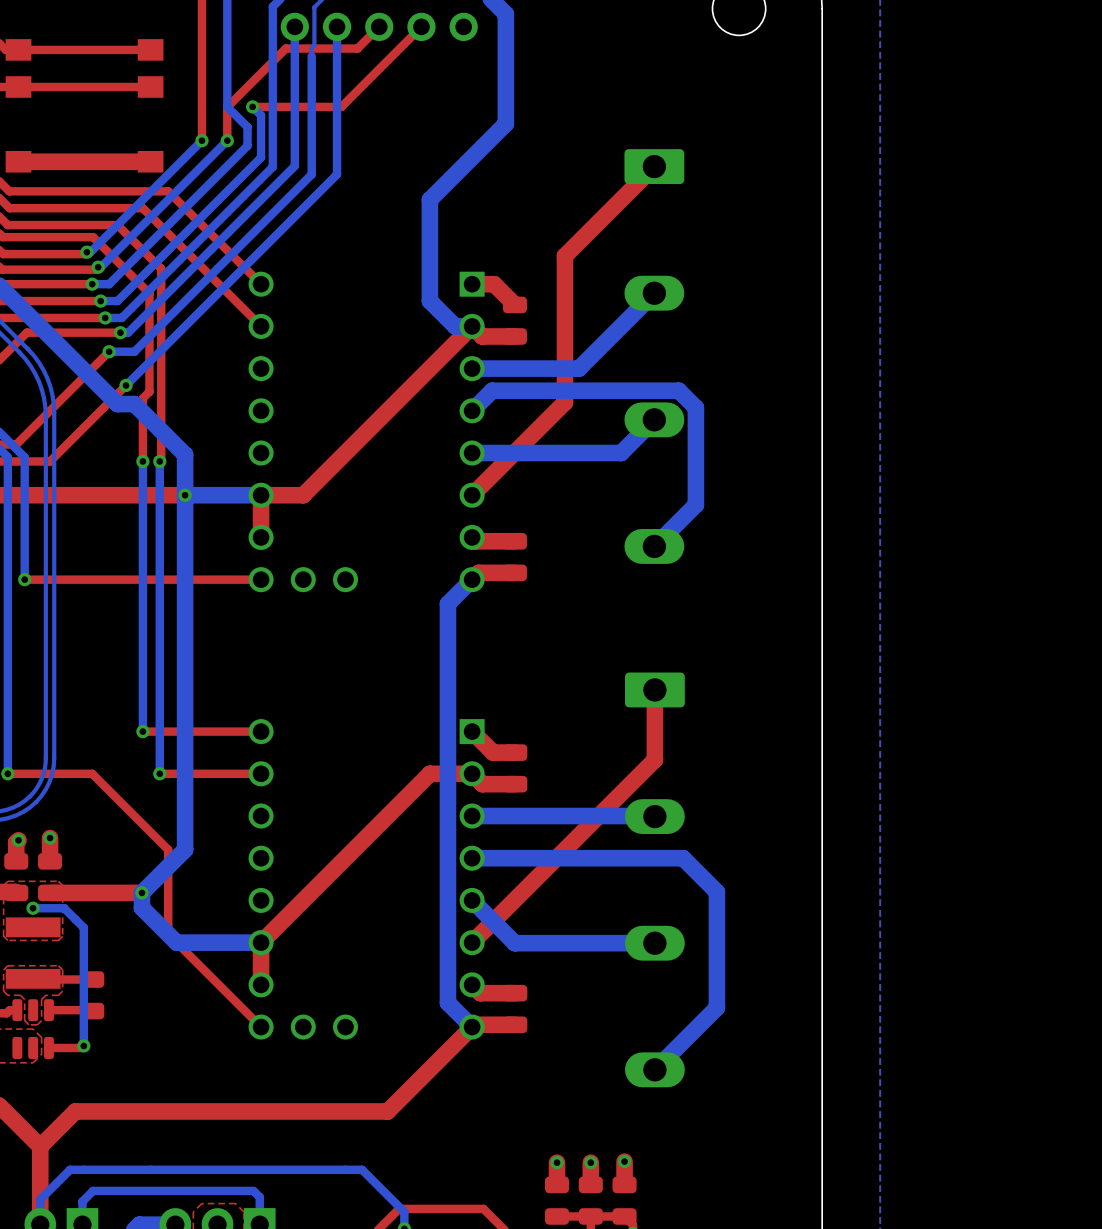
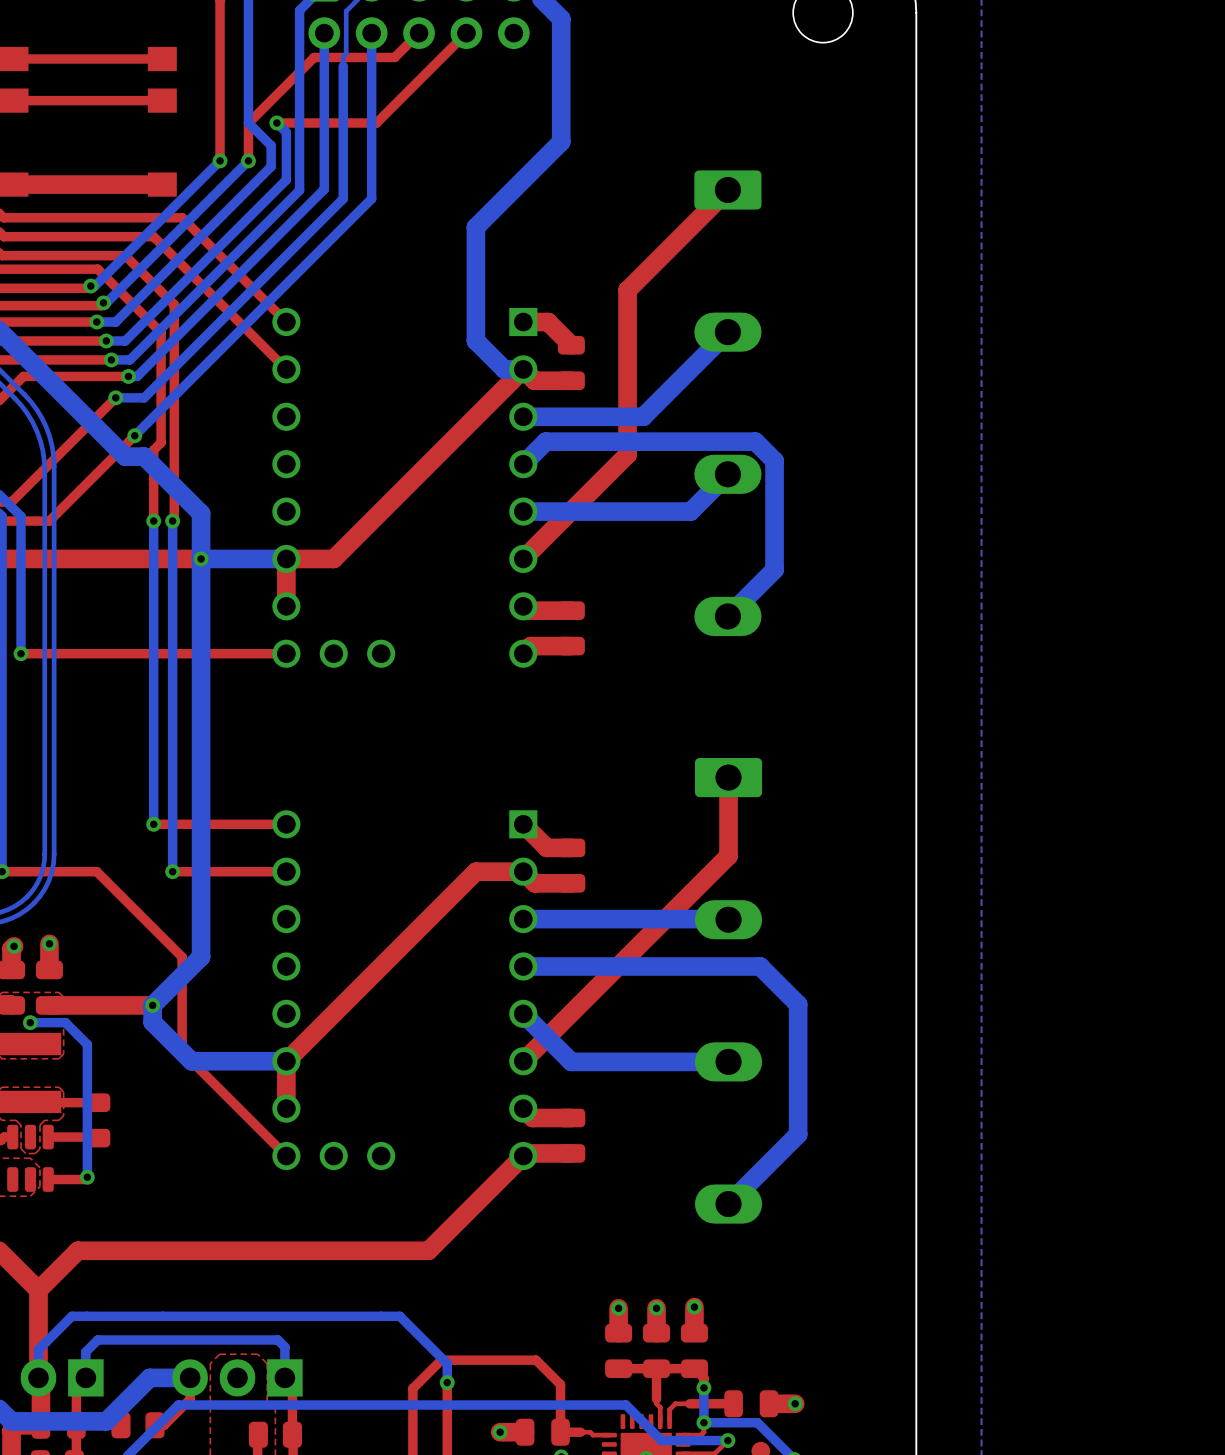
bottom track: (472, 579) (447, 603) (447, 1002) (472, 1027) -> none

